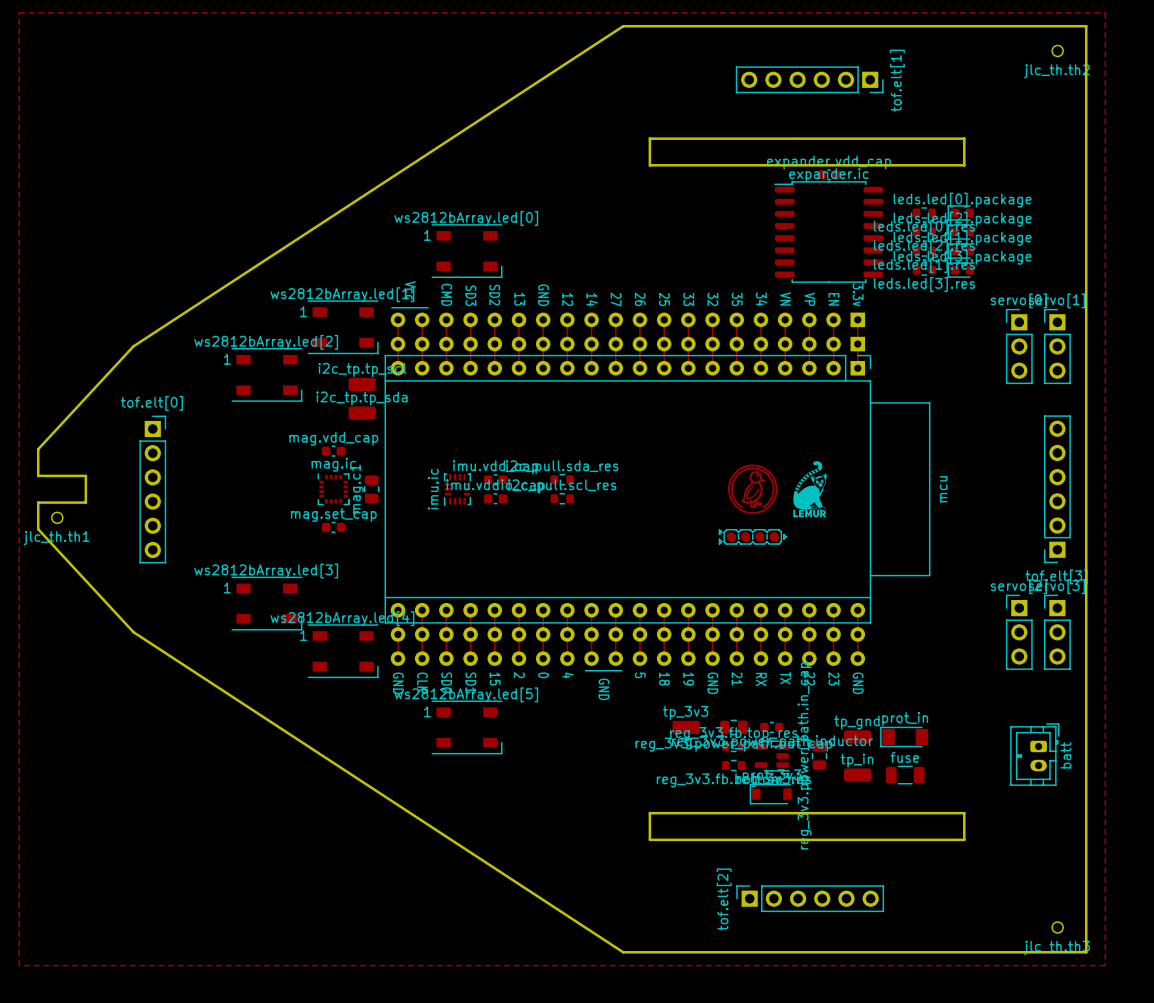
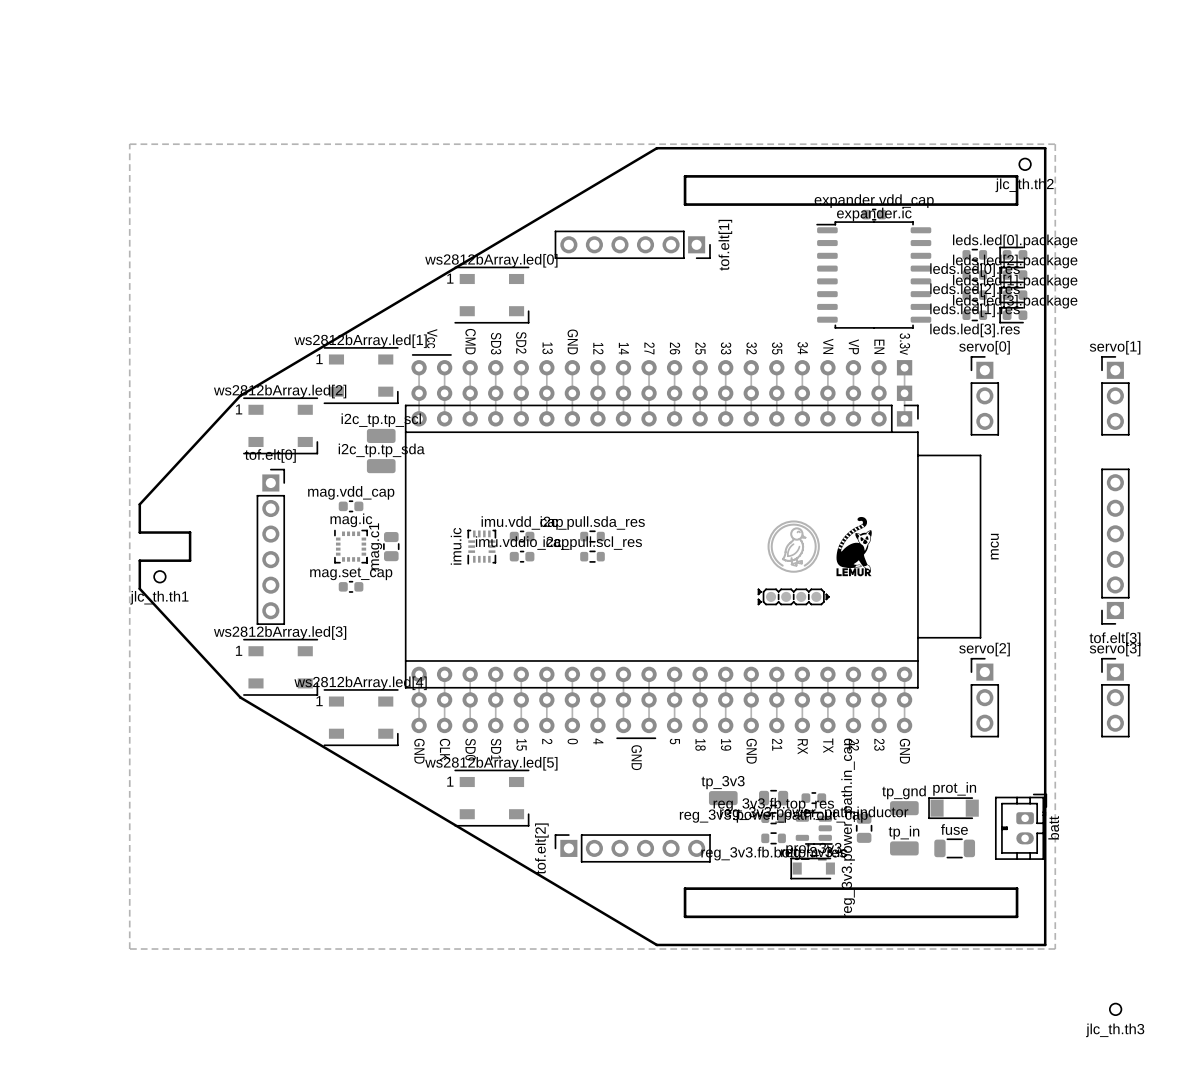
zone outline: (19, 12) (19, 965) (1105, 965) (1105, 12) (19, 12) -> (129, 144) (129, 949) (1055, 949) (1055, 144) (129, 144)
board edge: (623, 26) (133, 346) (38, 449) (38, 475) (85, 475) (85, 502) (38, 502) (38, 529) (133, 632) (623, 952) (1086, 952) (1086, 26) (623, 26) -> (656, 148) (240, 395) (139, 504) (139, 532) (190, 532) (190, 560) (139, 560) (139, 588) (240, 697) (656, 944) (1045, 944) (1045, 148) (656, 148)
jlc_th.th2 position: (1057, 50) -> (1025, 164)
tof.elt[1] position: (809, 79) -> (632, 244)
servo[0] position: (1019, 346) -> (984, 395)
tof.elt[0] position: (152, 489) -> (270, 546)
jlc_th.th1 position: (57, 517) -> (159, 576)
servo[2] position: (1019, 632) -> (984, 697)
batt position: (1034, 754) -> (1021, 826)
tof.elt[2] position: (810, 898) -> (632, 848)

